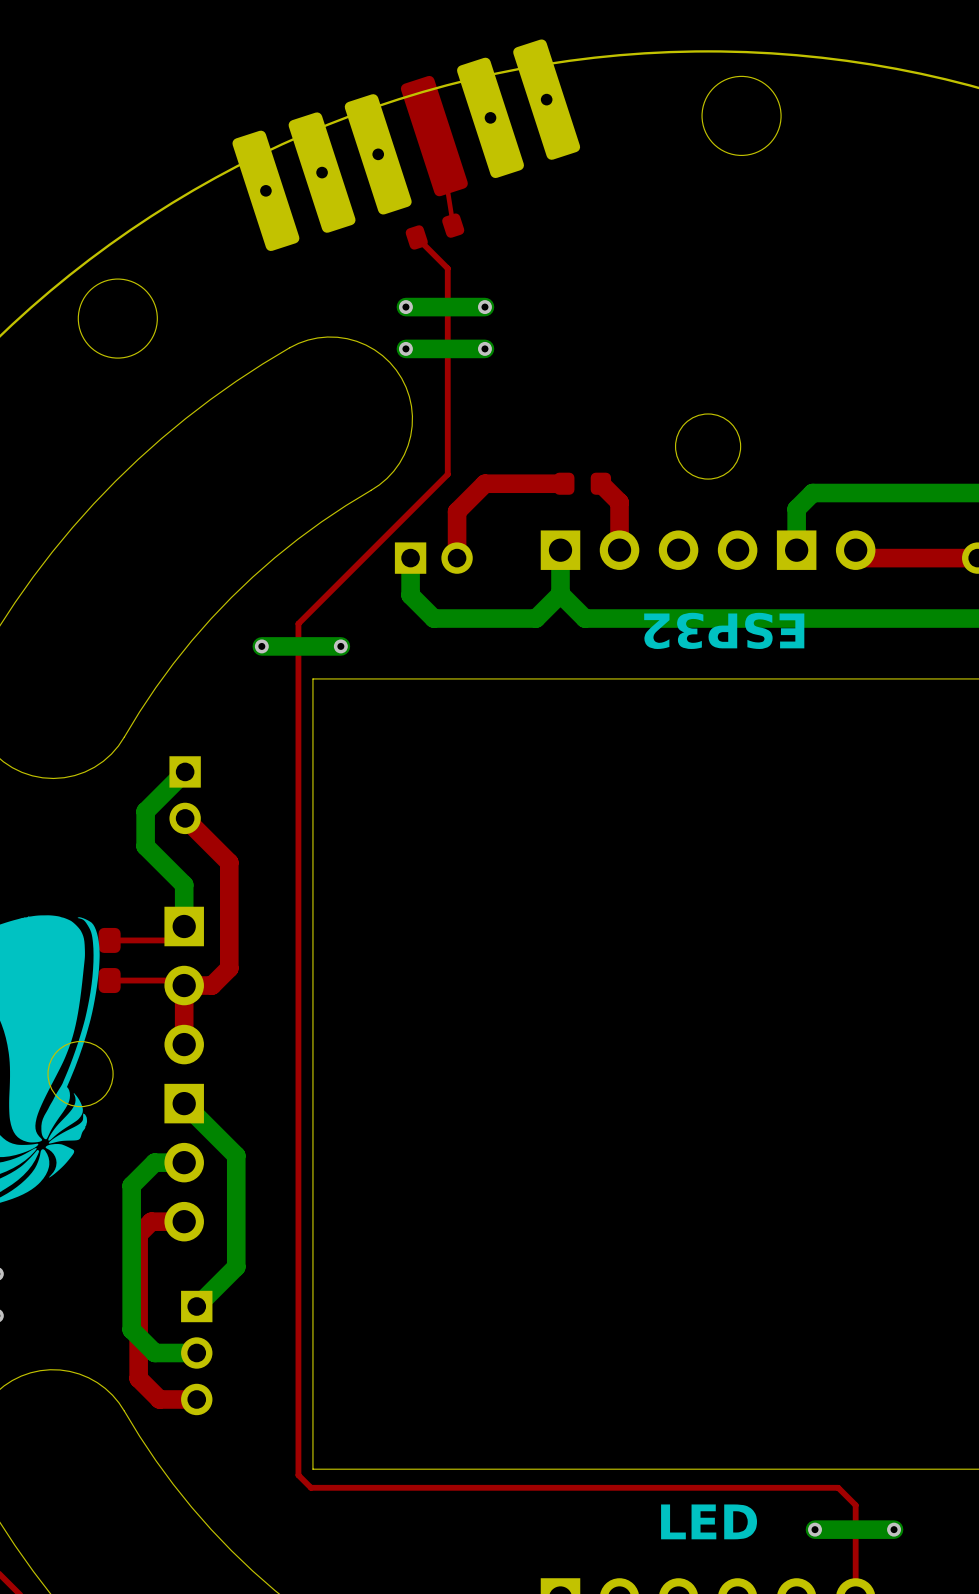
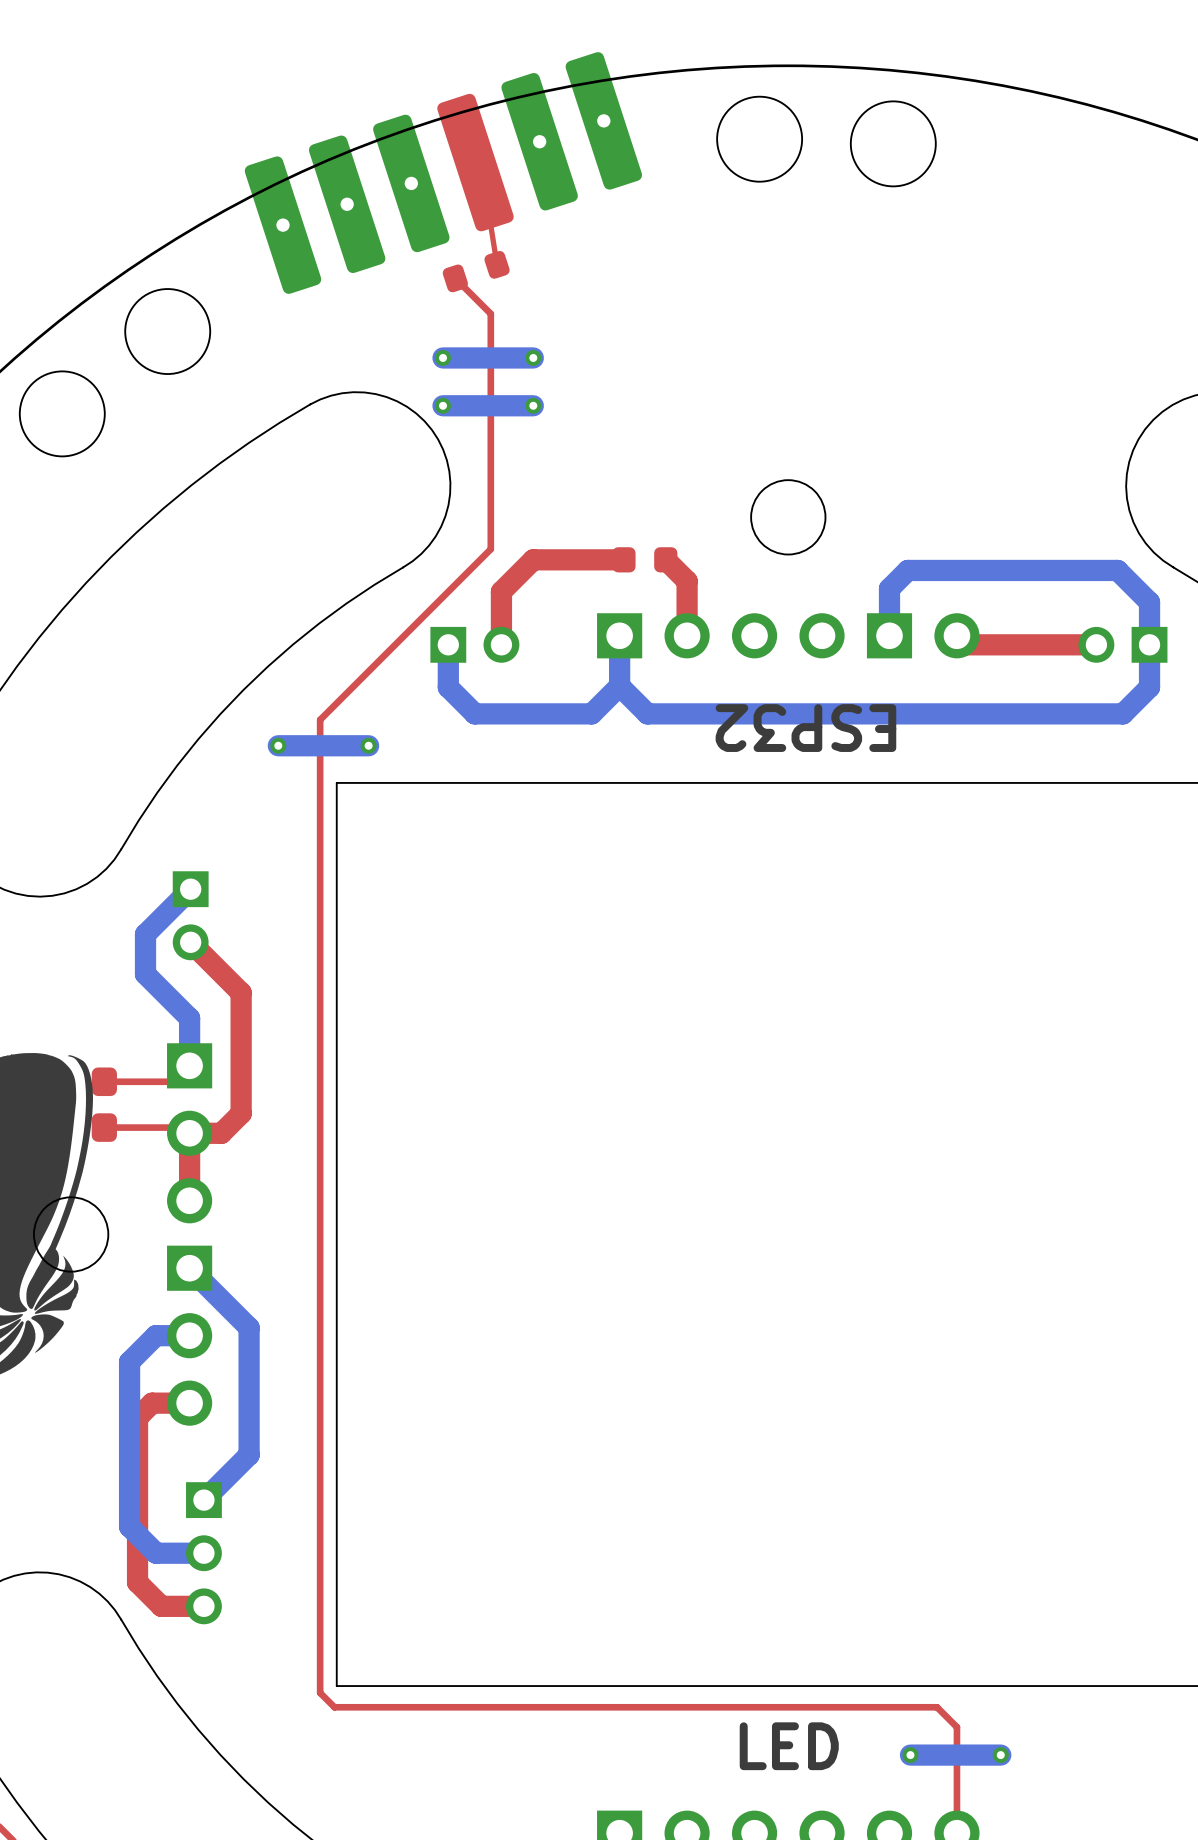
round board edge: [701, 75, 782, 157] -> none
round board edge: none -> [716, 96, 803, 183]
round board edge: none -> [850, 100, 937, 188]
round board edge: none -> [124, 288, 211, 375]
round board edge: [77, 278, 158, 359] -> none
round board edge: none -> [19, 370, 106, 458]

